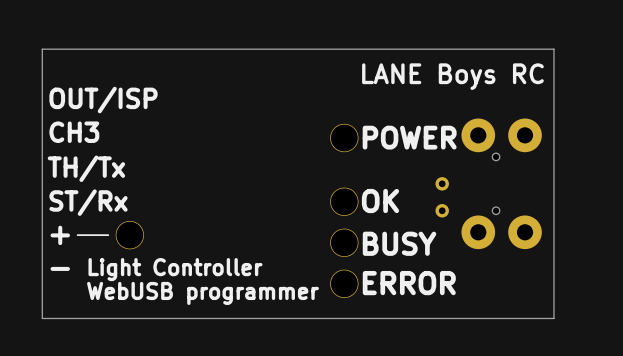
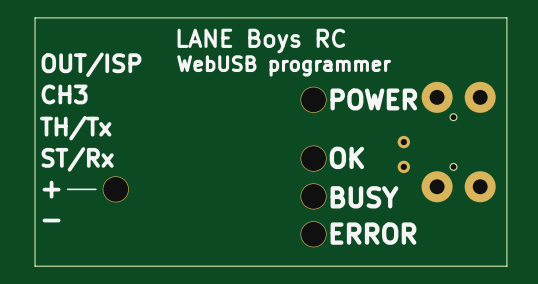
text position: LANE Boys RC (452, 76) -> LANE Boys RC (261, 41)
text: Light Controller (175, 269) -> none
text position: WebUSB programmer (202, 293) -> WebUSB programmer (284, 65)

